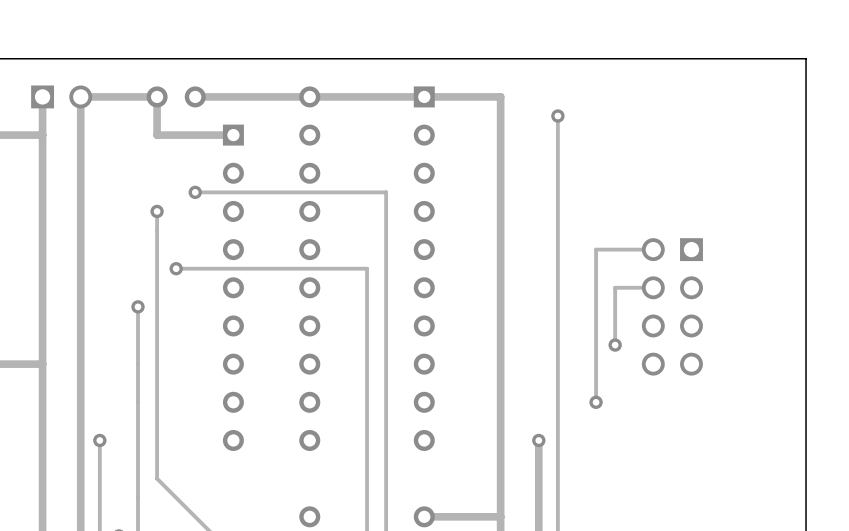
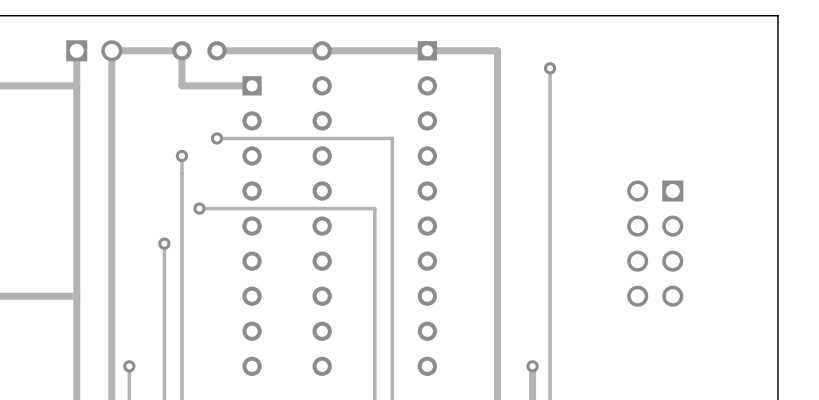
track: (653, 249) (596, 249) (596, 402) -> none
track: (653, 287) (615, 287) (615, 345) -> none
via: (615, 345) -> none
via: (596, 402) -> none

